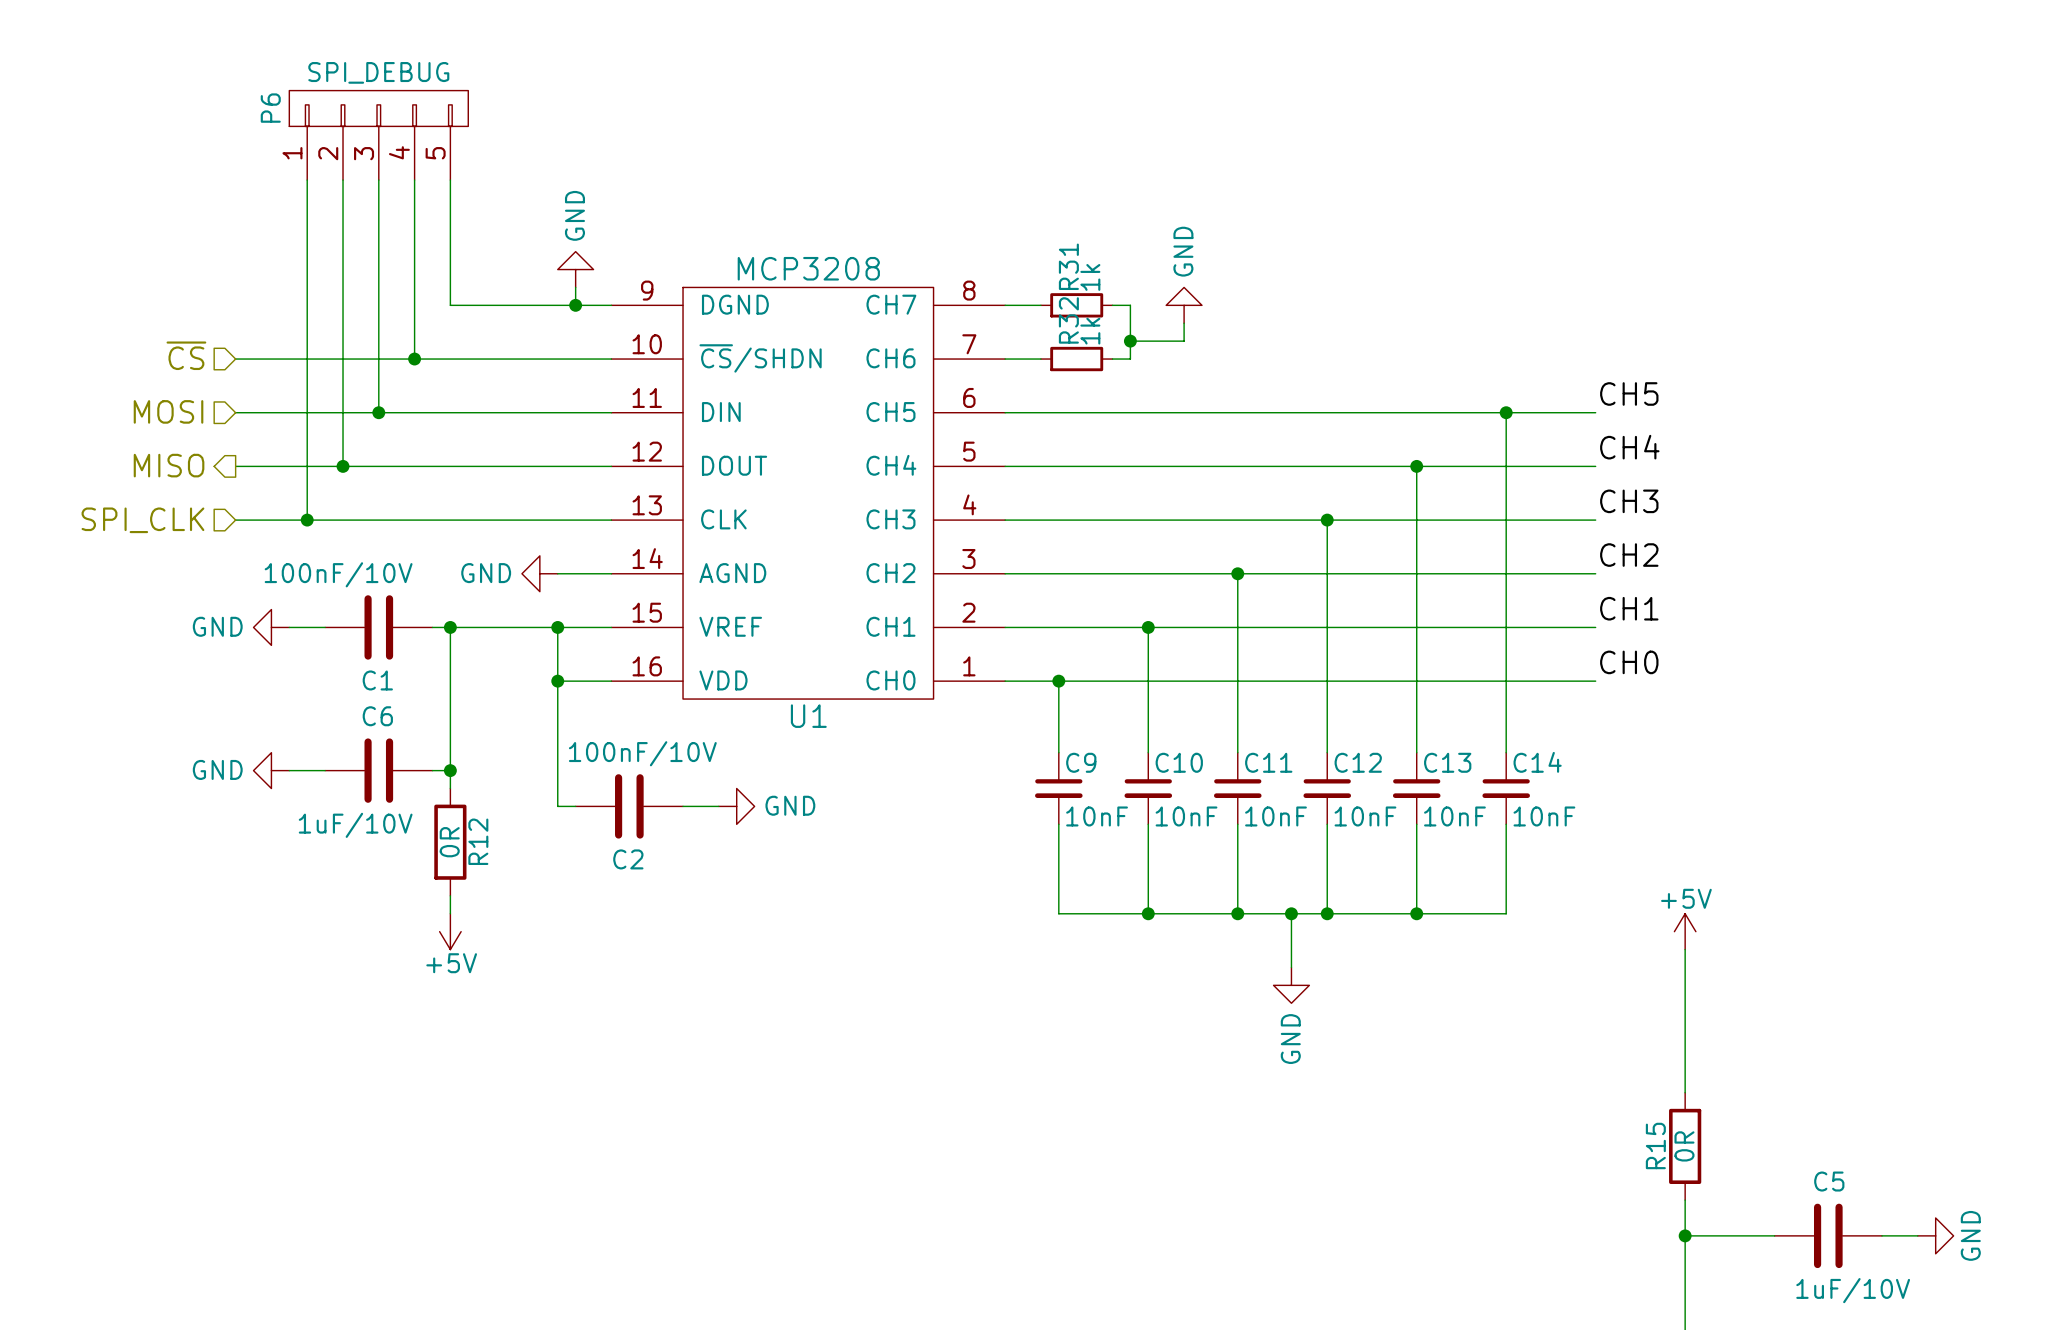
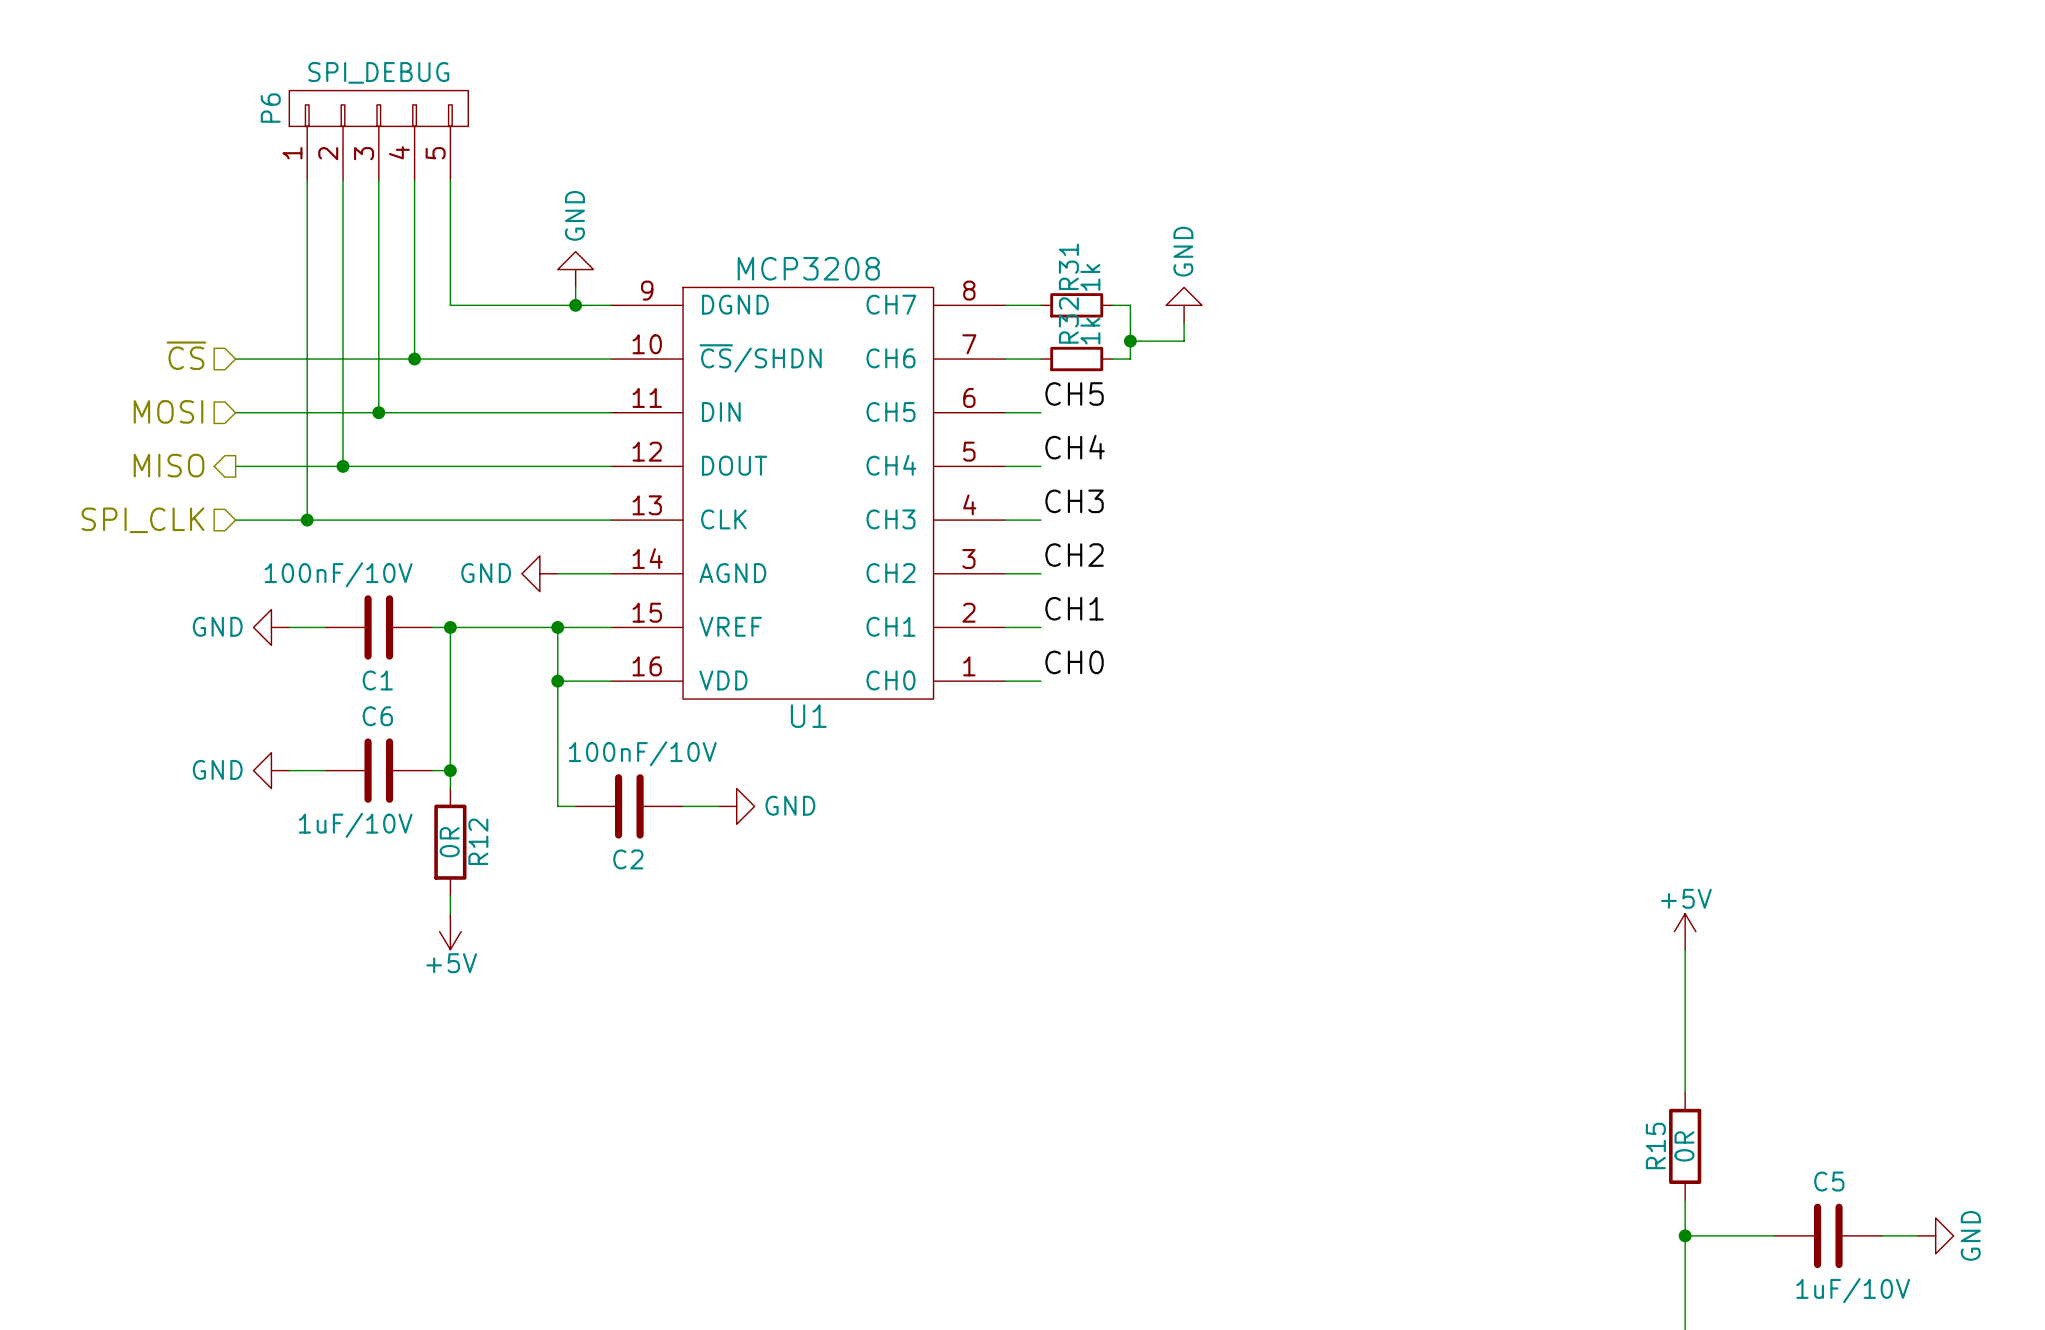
label: none -> CH5 (1074, 393)
label: CH5 (1629, 393) -> none
wire: (1040, 412) (1595, 412) -> none
wire: (1506, 412) (1506, 752) -> none
junction: (1506, 412) -> none
label: none -> CH4 (1075, 447)
label: CH4 (1629, 447) -> none
wire: (1040, 466) (1595, 466) -> none
wire: (1416, 466) (1416, 752) -> none
junction: (1416, 466) -> none
label: none -> CH3 (1074, 501)
label: CH3 (1629, 501) -> none
wire: (1040, 520) (1595, 520) -> none
wire: (1327, 520) (1327, 752) -> none
junction: (1327, 520) -> none
label: none -> CH2 (1074, 555)
label: CH2 (1629, 555) -> none
wire: (1040, 573) (1595, 573) -> none
wire: (1237, 573) (1237, 752) -> none
junction: (1237, 573) -> none
label: none -> CH1 (1074, 608)
label: CH1 (1629, 608) -> none
wire: (1040, 627) (1595, 627) -> none
wire: (1148, 627) (1148, 752) -> none
junction: (1148, 627) -> none
label: none -> CH0 (1074, 662)
label: CH0 (1629, 662) -> none
wire: (1040, 681) (1595, 681) -> none
wire: (1058, 681) (1058, 752) -> none
junction: (1058, 681) -> none
C9: 10nF (1058, 788) -> none
C10: 10nF (1148, 788) -> none
C11: 10nF (1237, 788) -> none
C12: 10nF (1327, 788) -> none
C13: 10nF (1416, 788) -> none
C14: 10nF (1506, 788) -> none
wire: (1058, 824) (1058, 913) (1506, 913) (1506, 824) -> none
wire: (1148, 824) (1148, 913) -> none
wire: (1237, 824) (1237, 913) -> none
wire: (1327, 824) (1327, 913) -> none
wire: (1416, 824) (1416, 913) -> none
junction: (1148, 913) -> none
junction: (1237, 913) -> none
wire: (1291, 913) (1291, 967) -> none
junction: (1291, 913) -> none
junction: (1327, 913) -> none
junction: (1416, 913) -> none
power symbol: GND (1291, 985) -> none

